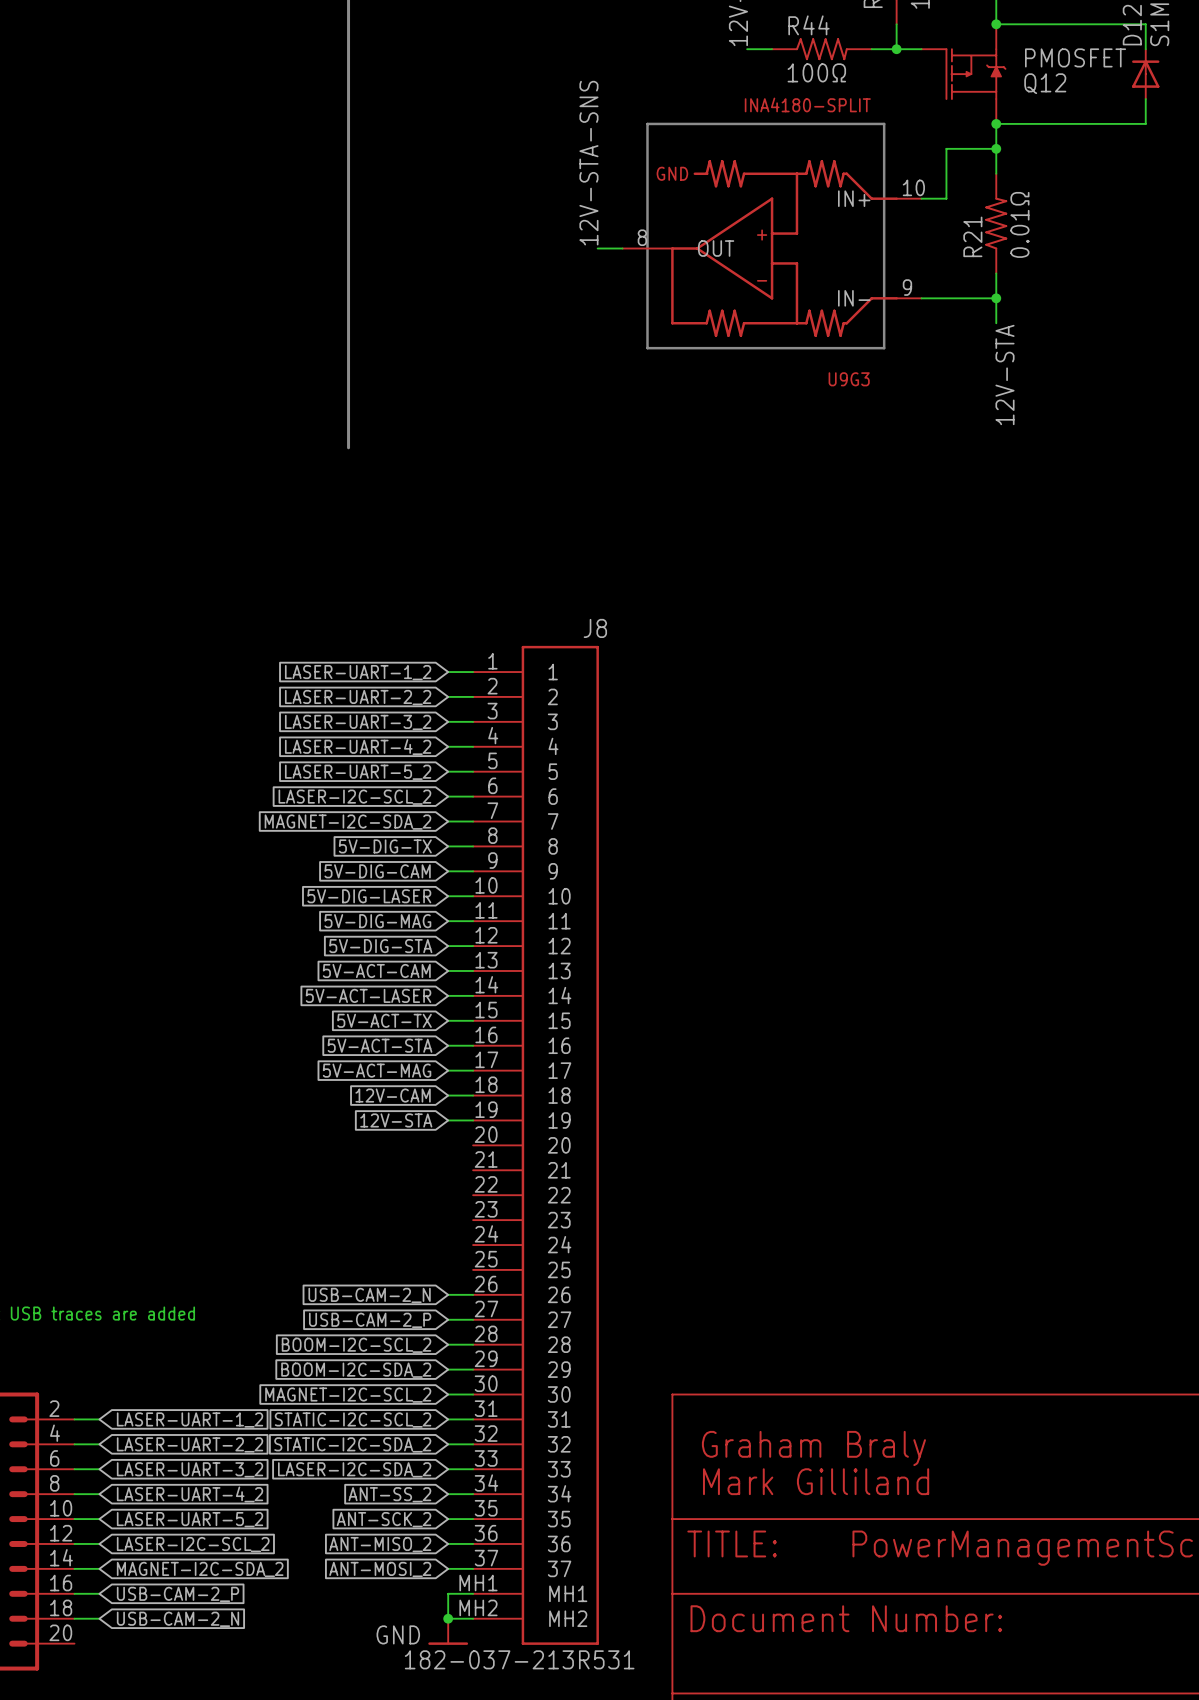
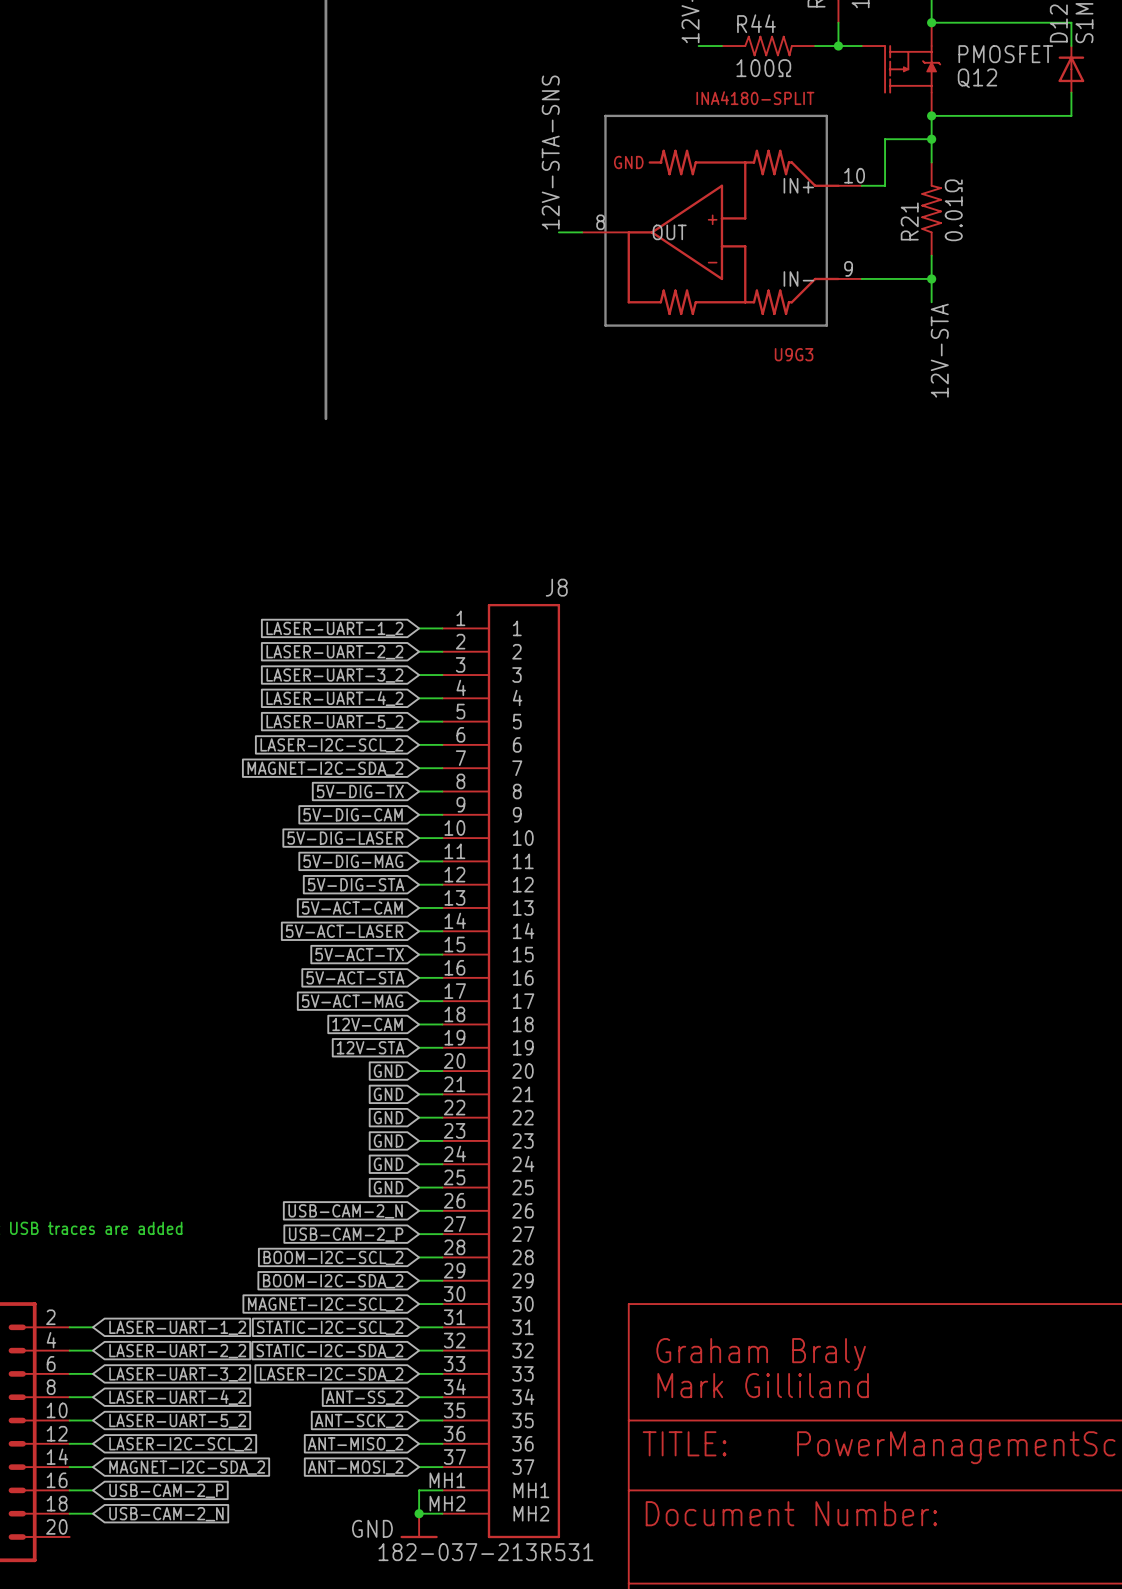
global label: none -> GND (388, 1071)
wire: none -> (419, 1071) (442, 1071)
global label: none -> GND (388, 1094)
wire: none -> (419, 1094) (442, 1094)
global label: none -> GND (388, 1117)
wire: none -> (419, 1117) (442, 1117)
global label: none -> GND (388, 1140)
wire: none -> (419, 1140) (442, 1140)
global label: none -> GND (388, 1164)
wire: none -> (419, 1164) (442, 1164)
global label: none -> GND (388, 1187)
wire: none -> (419, 1187) (442, 1187)

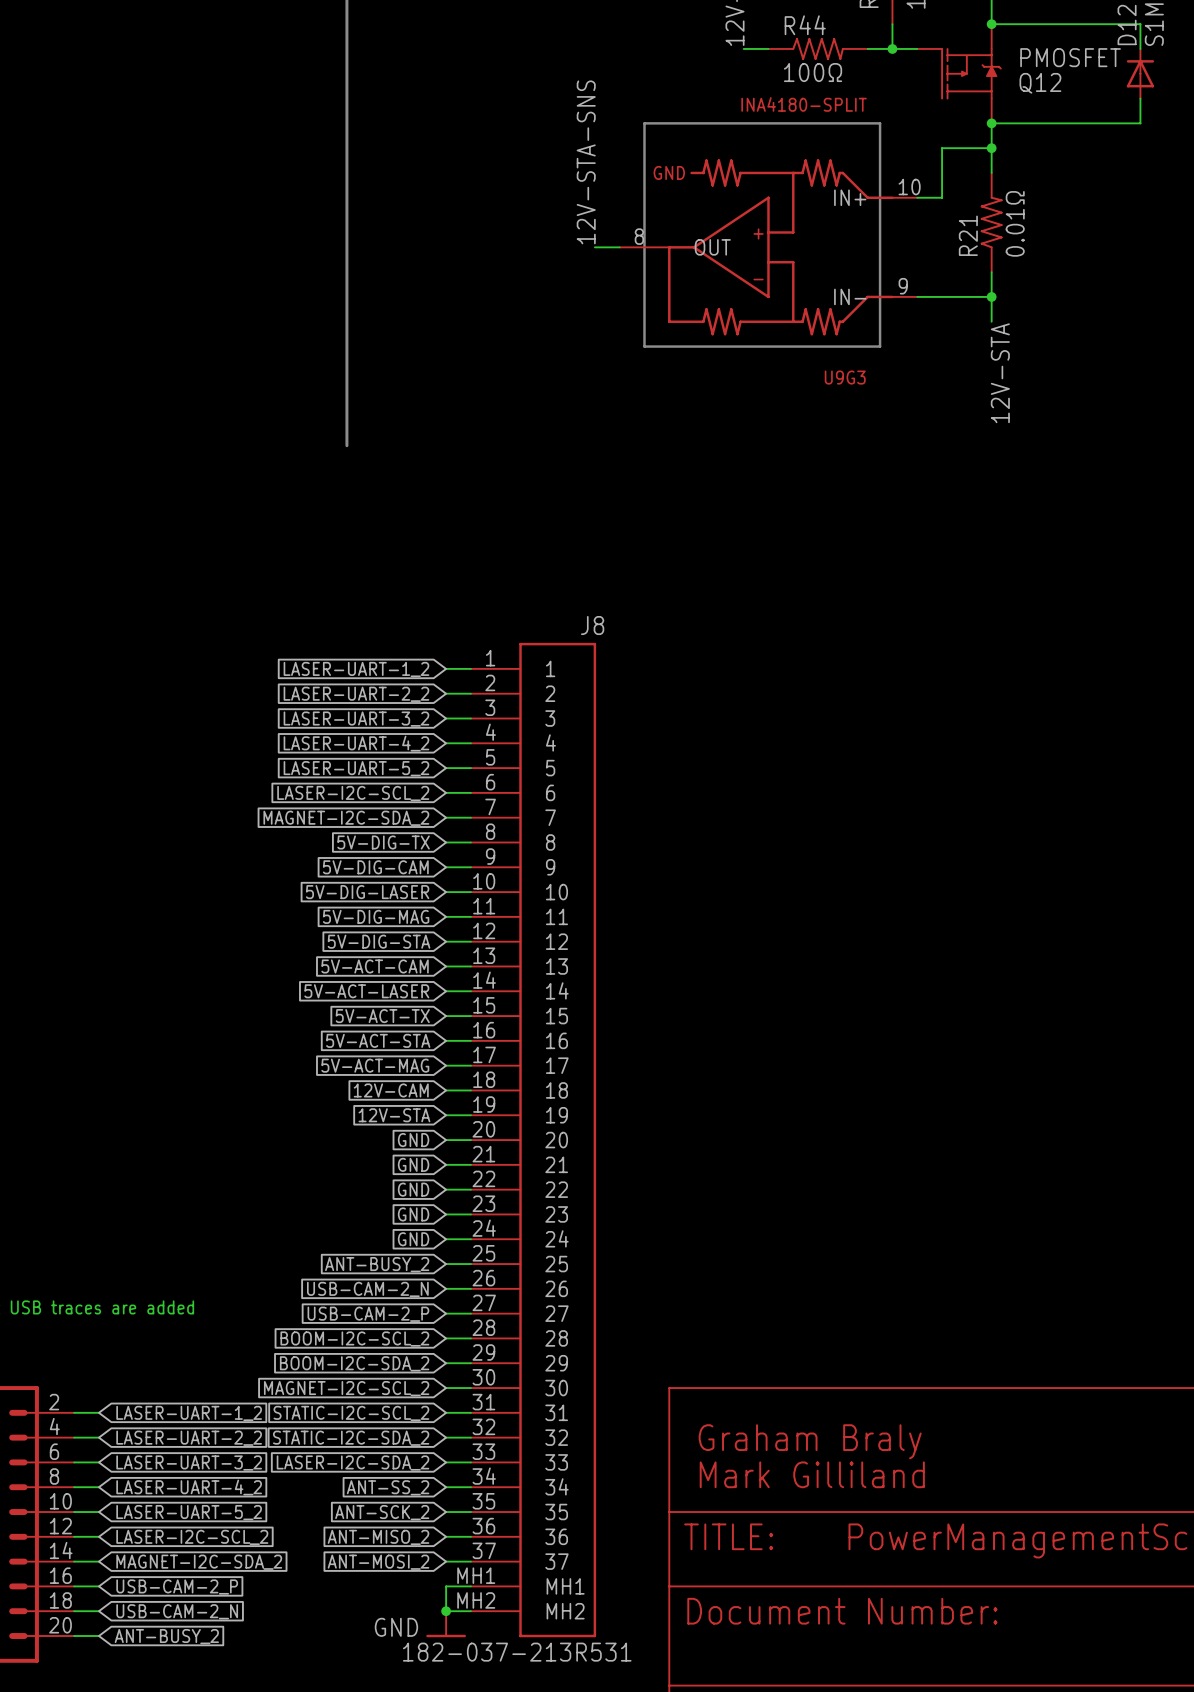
global label: GND (388, 1187) -> ANT-BUSY_2 (377, 1264)
wire: none -> (74, 1636) (98, 1636)
global label: none -> ANT-BUSY_2 (166, 1636)

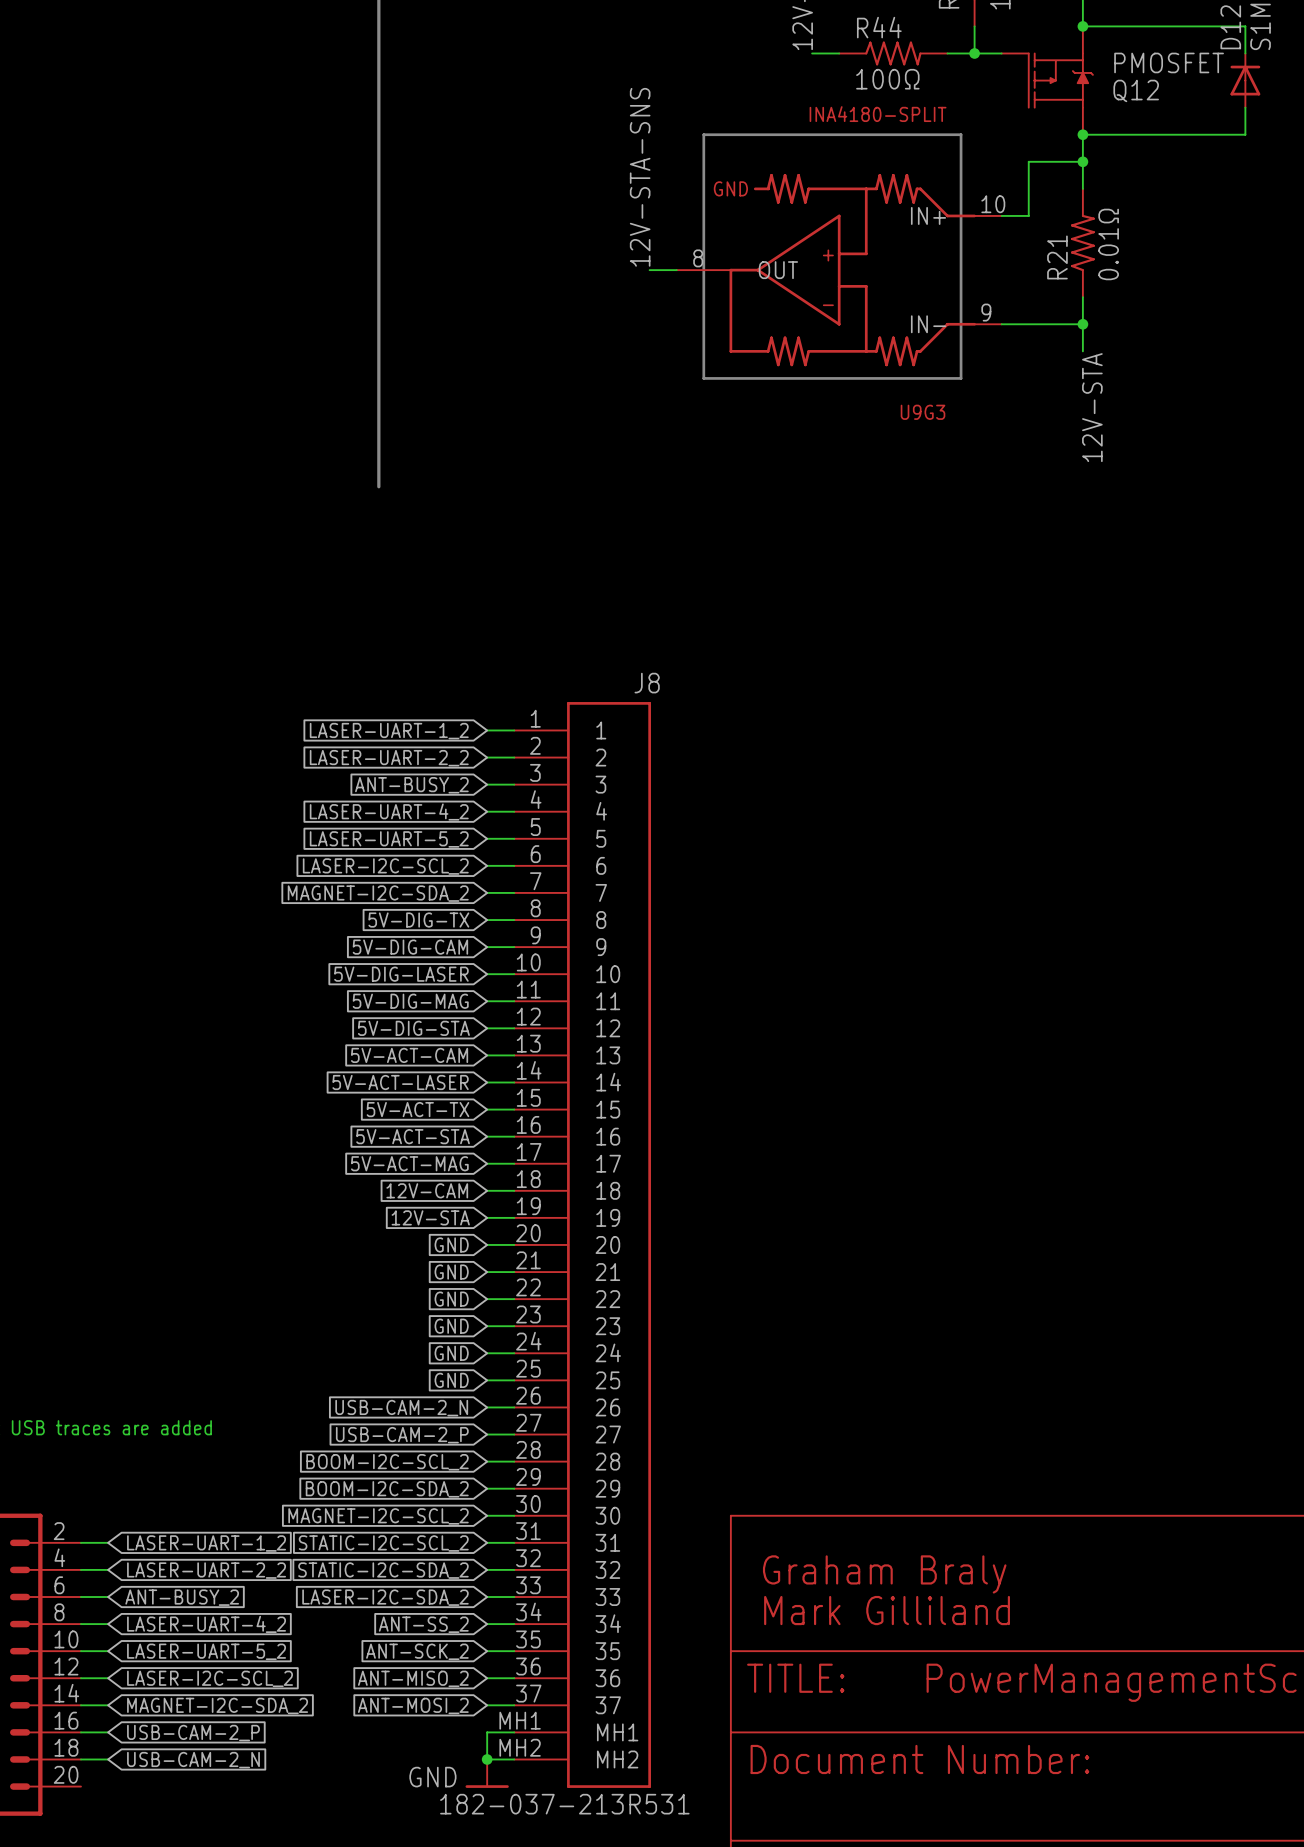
global label: LASER-UART-3_2 (356, 719) -> ANT-BUSY_2 (411, 785)
global label: ANT-BUSY_2 (377, 1264) -> GND (451, 1380)
global label: LASER-UART-3_2 (189, 1463) -> ANT-BUSY_2 (182, 1597)
wire: (74, 1636) (98, 1636) -> none
global label: ANT-BUSY_2 (166, 1636) -> none

